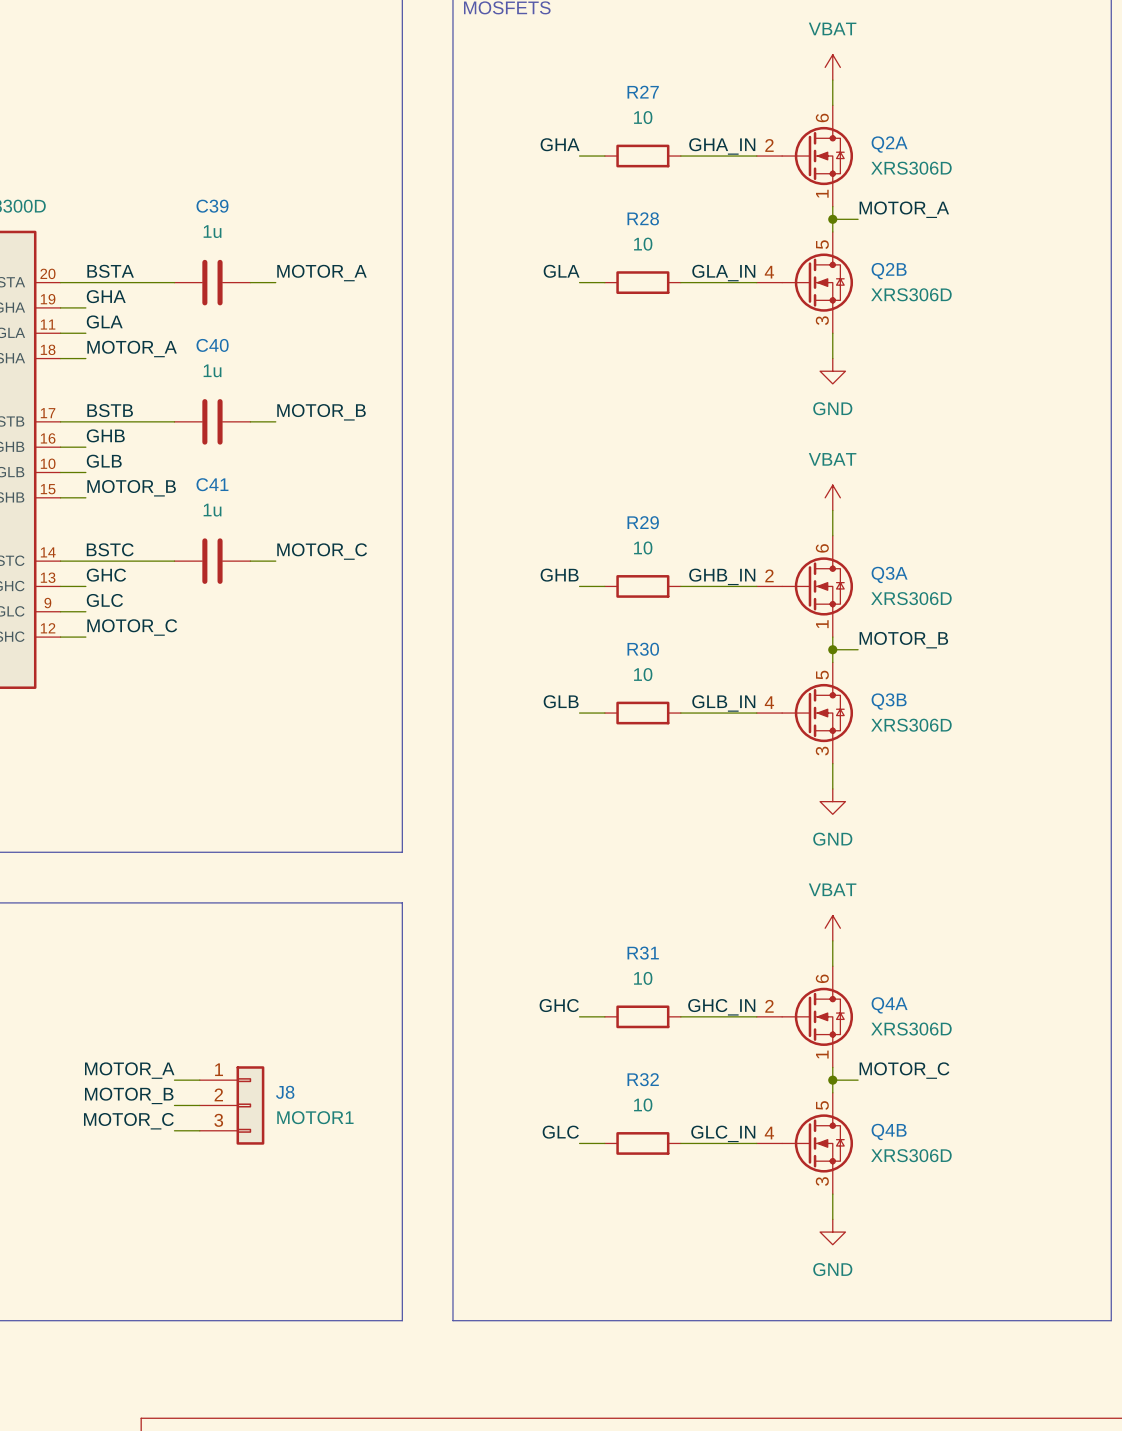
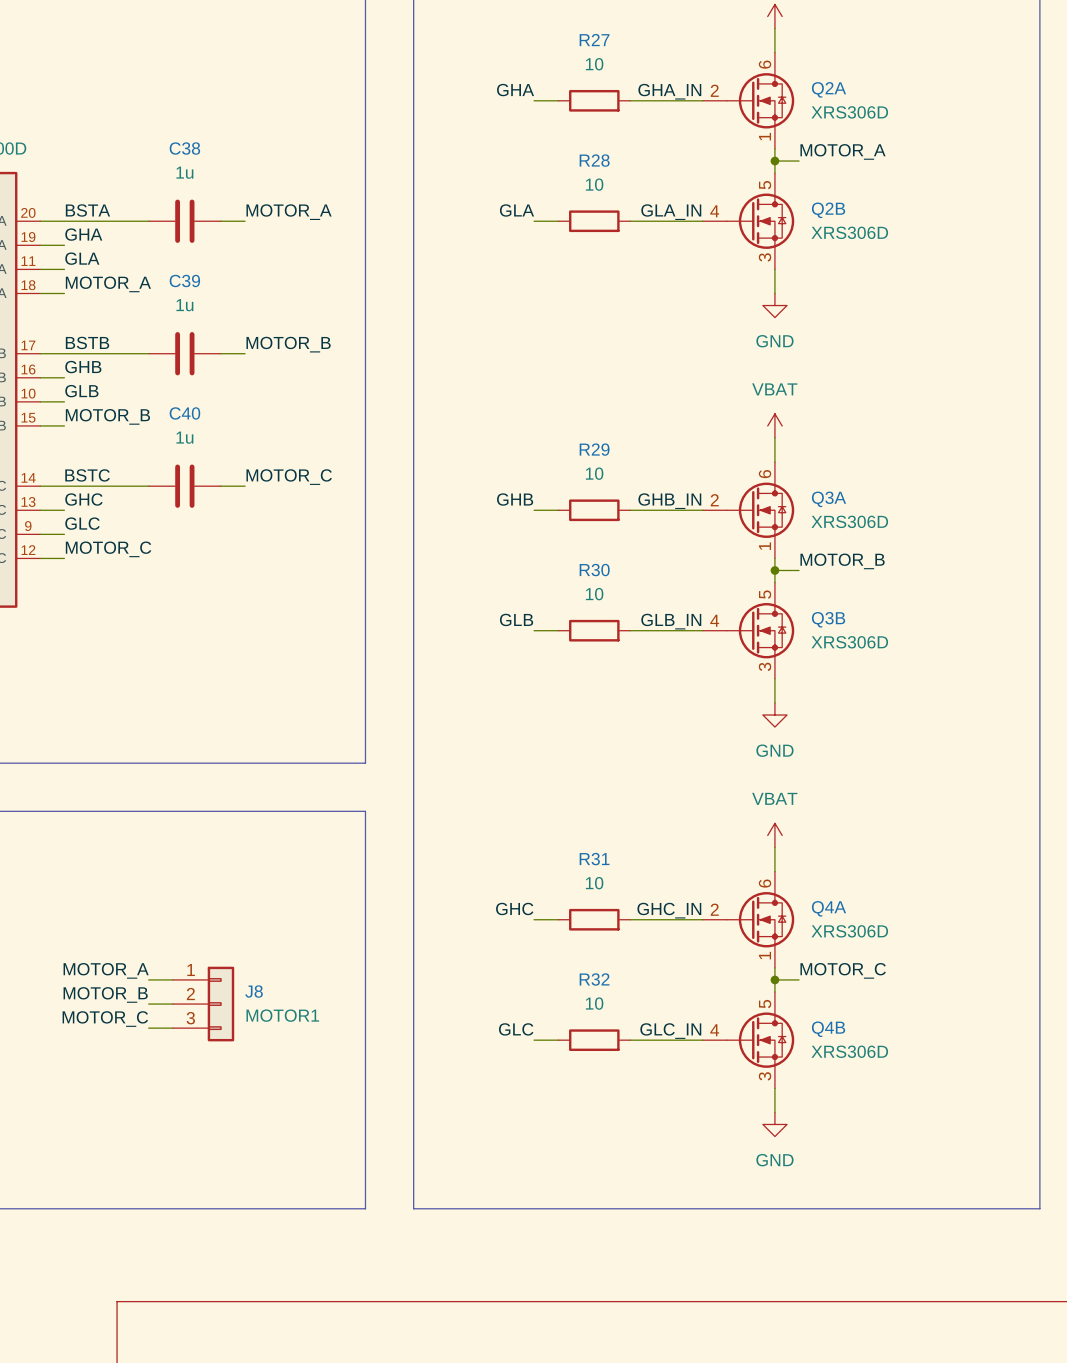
C39 name: C39 (212, 206) -> C38 (184, 148)
C40 name: C40 (212, 345) -> C39 (184, 281)
C41 name: C41 (212, 484) -> C40 (184, 413)

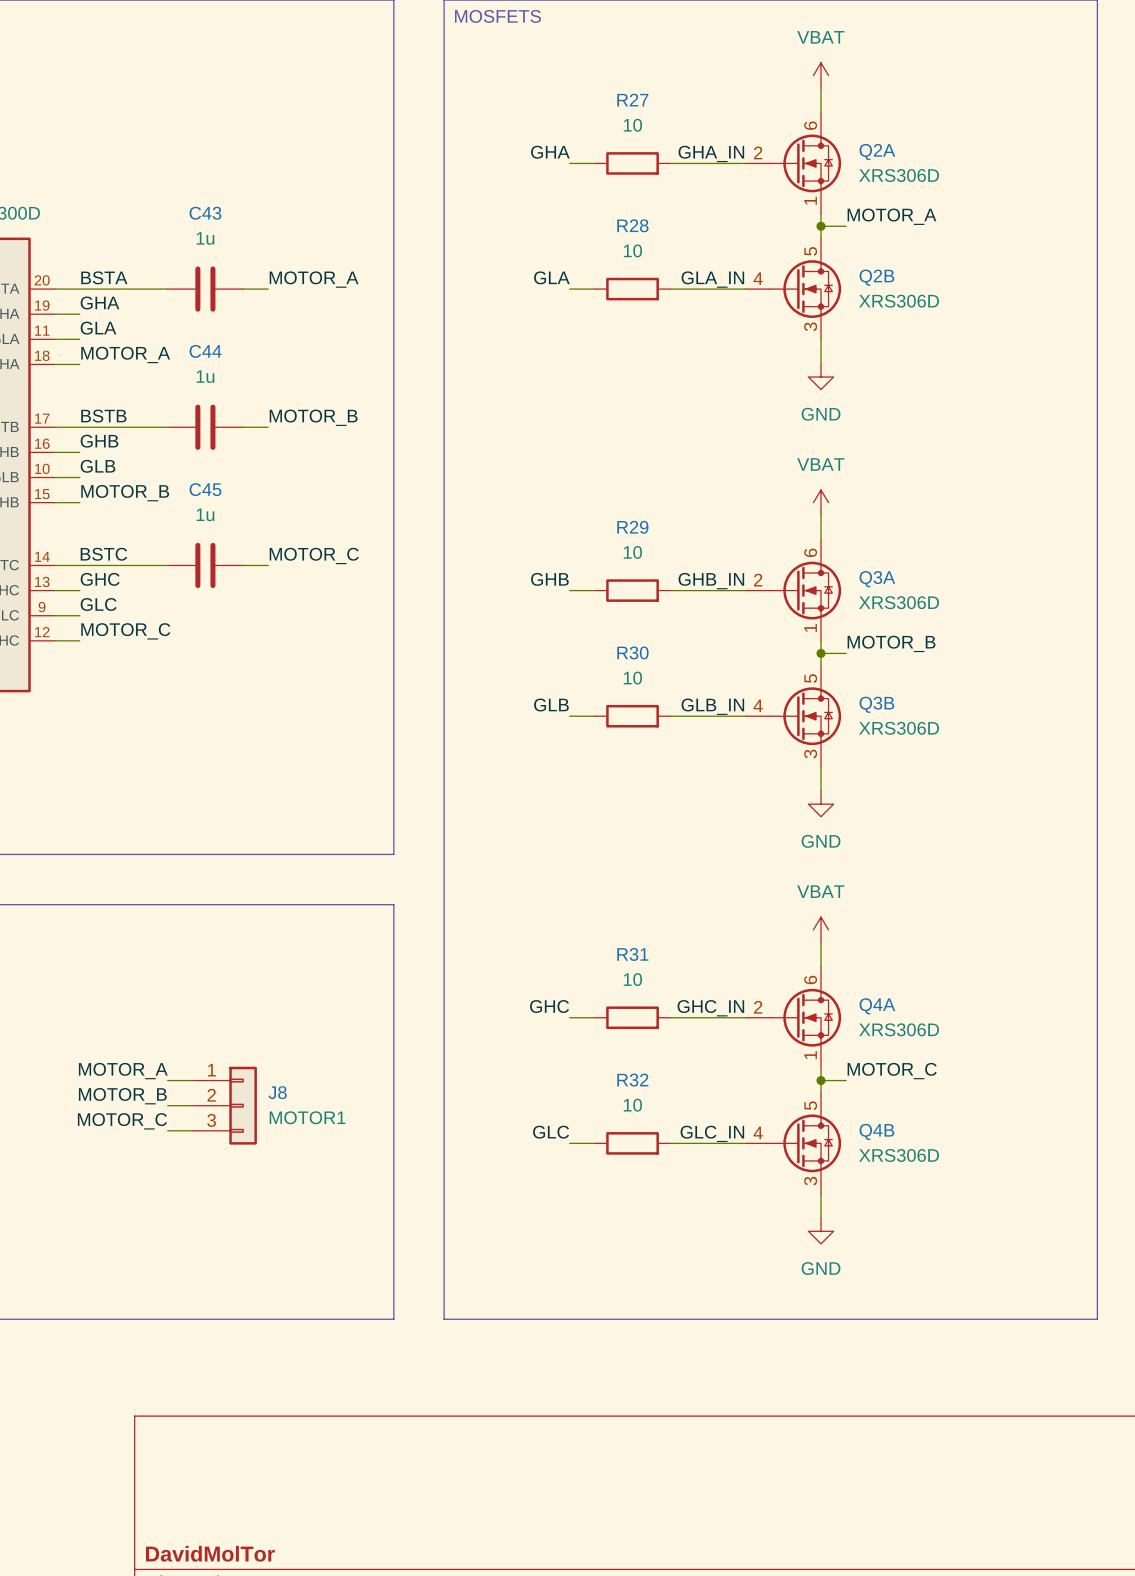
C38 name: C38 (184, 148) -> C43 (205, 213)
C39 name: C39 (184, 281) -> C44 (205, 351)
C40 name: C40 (184, 413) -> C45 (205, 489)

